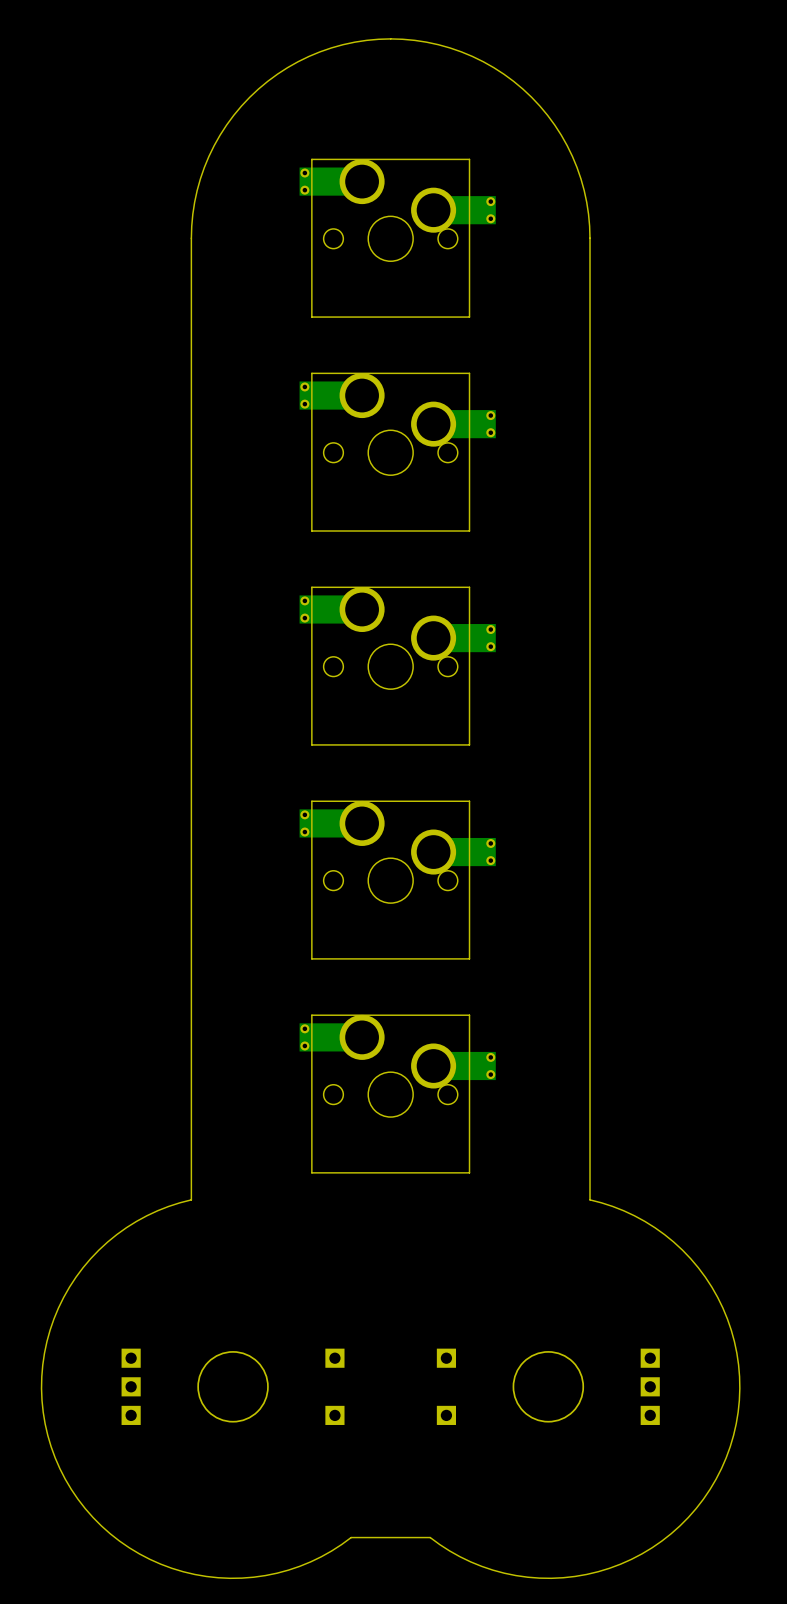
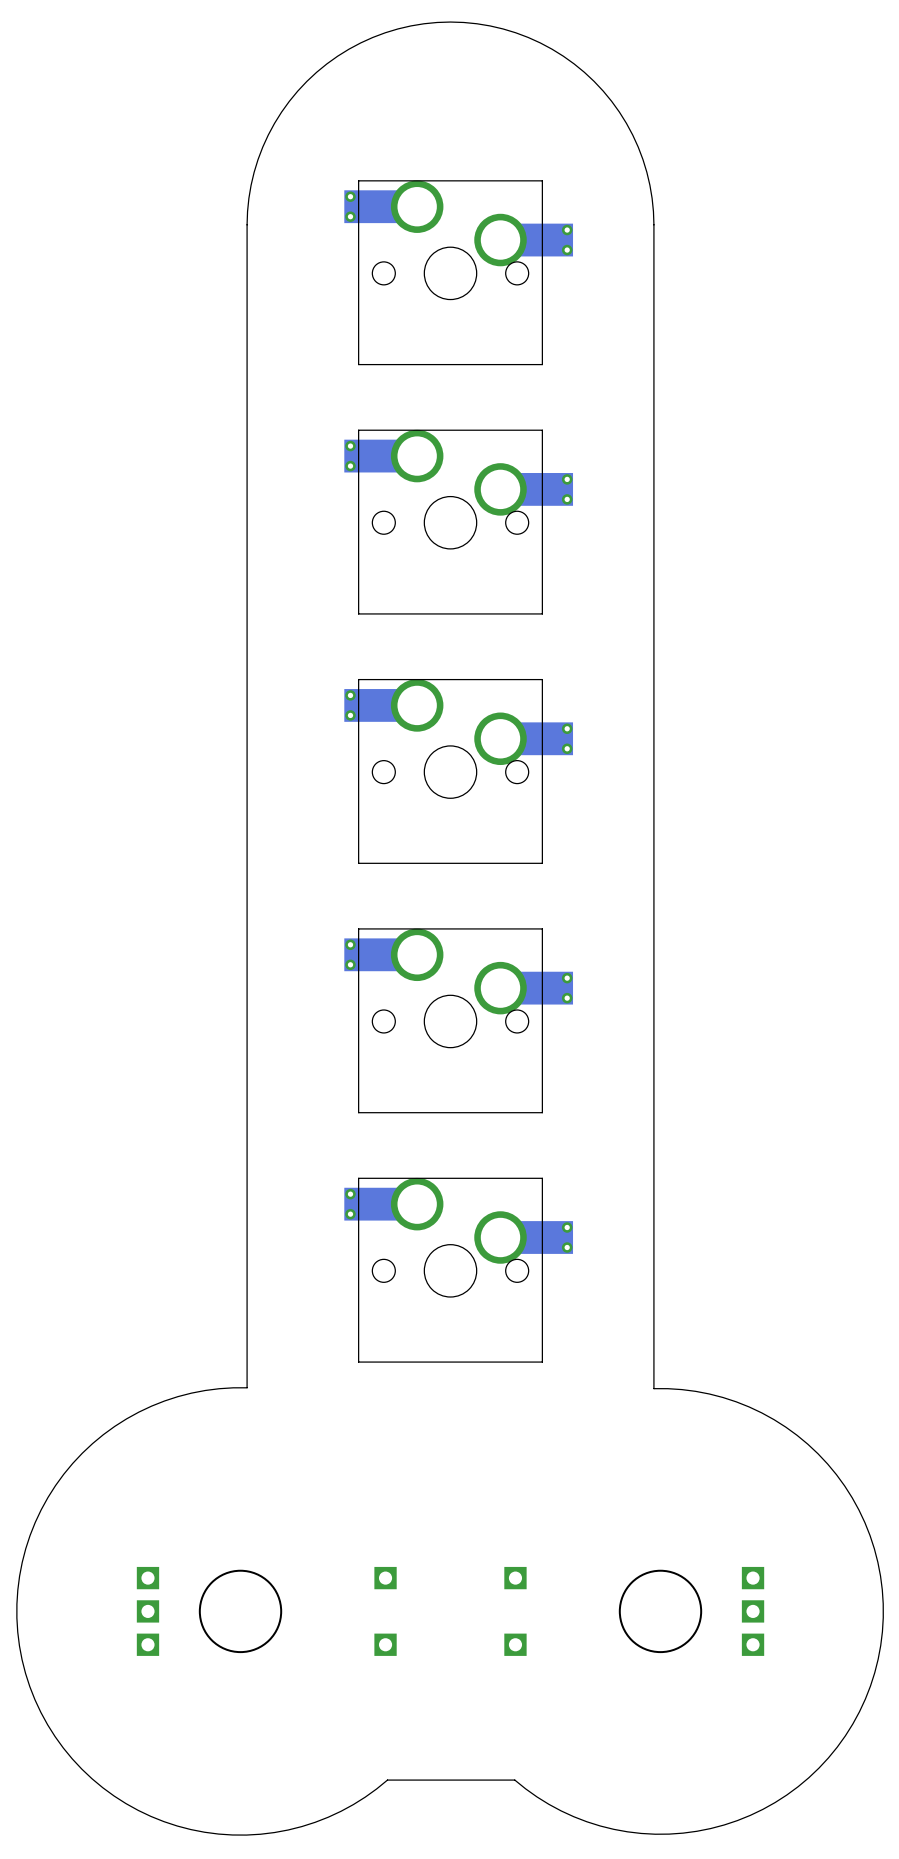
board edge: (390, 38) (426, 42) (449, 47) (483, 61) (513, 81) (531, 97) (554, 125) (572, 156) (584, 190) (590, 238) (590, 1199) (623, 1210) (644, 1221) (673, 1242) (690, 1258) (711, 1287) (722, 1308) (734, 1341) (738, 1364) (739, 1400) (733, 1435) (721, 1468) (703, 1499) (679, 1525) (652, 1547) (609, 1568) (574, 1576) (539, 1578) (504, 1573) (460, 1556) (430, 1537) (351, 1537) (310, 1561) (288, 1570) (253, 1577) (206, 1576) (171, 1568) (139, 1553) (119, 1541) (85, 1508) (71, 1489) (55, 1457) (43, 1412) (41, 1376) (46, 1341) (58, 1308) (75, 1277) (98, 1250) (126, 1227) (157, 1210) (191, 1199) (191, 238) (197, 190) (208, 156) (220, 135) (241, 106) (267, 81) (287, 67) (320, 51) (354, 42) (390, 38) -> (247, 1387) (205, 1390) (177, 1396) (138, 1412) (103, 1434) (72, 1463) (55, 1485) (41, 1509) (25, 1548) (17, 1590) (17, 1632) (25, 1673) (34, 1699) (55, 1736) (81, 1769) (114, 1796) (138, 1810) (177, 1826) (204, 1832) (232, 1835) (260, 1834) (301, 1826) (328, 1817) (353, 1804) (387, 1780) (514, 1780) (548, 1804) (573, 1816) (600, 1825) (627, 1831) (655, 1834) (696, 1831) (737, 1820) (762, 1809) (786, 1794) (808, 1777) (828, 1757) (845, 1735) (859, 1711) (870, 1686) (878, 1659) (882, 1631) (883, 1603) (880, 1576) (870, 1535) (858, 1509) (844, 1485) (827, 1463) (807, 1444) (785, 1427) (761, 1412) (736, 1401) (709, 1393) (681, 1389) (653, 1388) (653, 224) (652, 198) (646, 172) (638, 147) (626, 123) (603, 91) (584, 72) (552, 49) (515, 32) (490, 25) (450, 22) (410, 25) (372, 37) (337, 56) (306, 81) (281, 112) (262, 147) (251, 185) (247, 224) (247, 1387)
round board edge position: (233, 1386) -> (240, 1611)
round board edge position: (548, 1386) -> (660, 1611)

